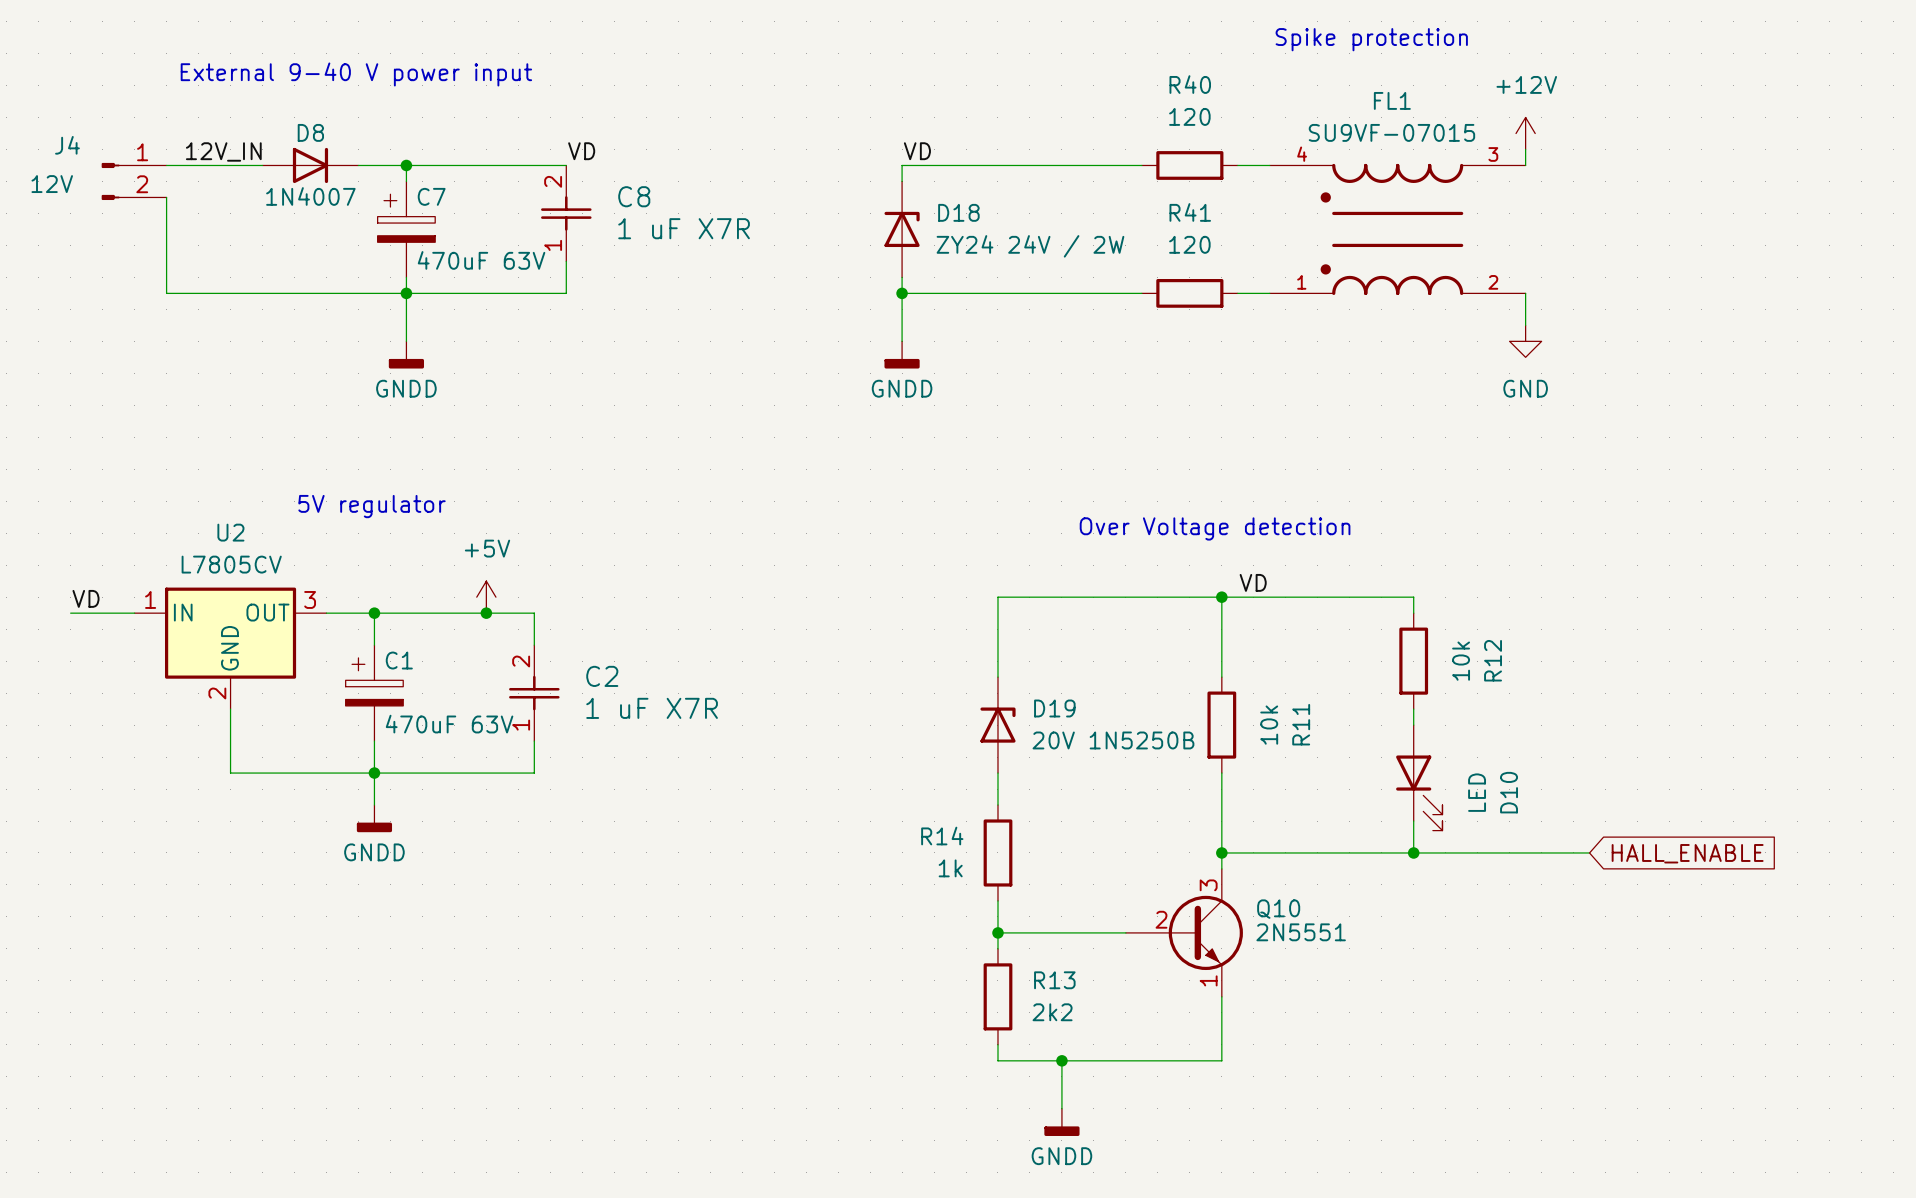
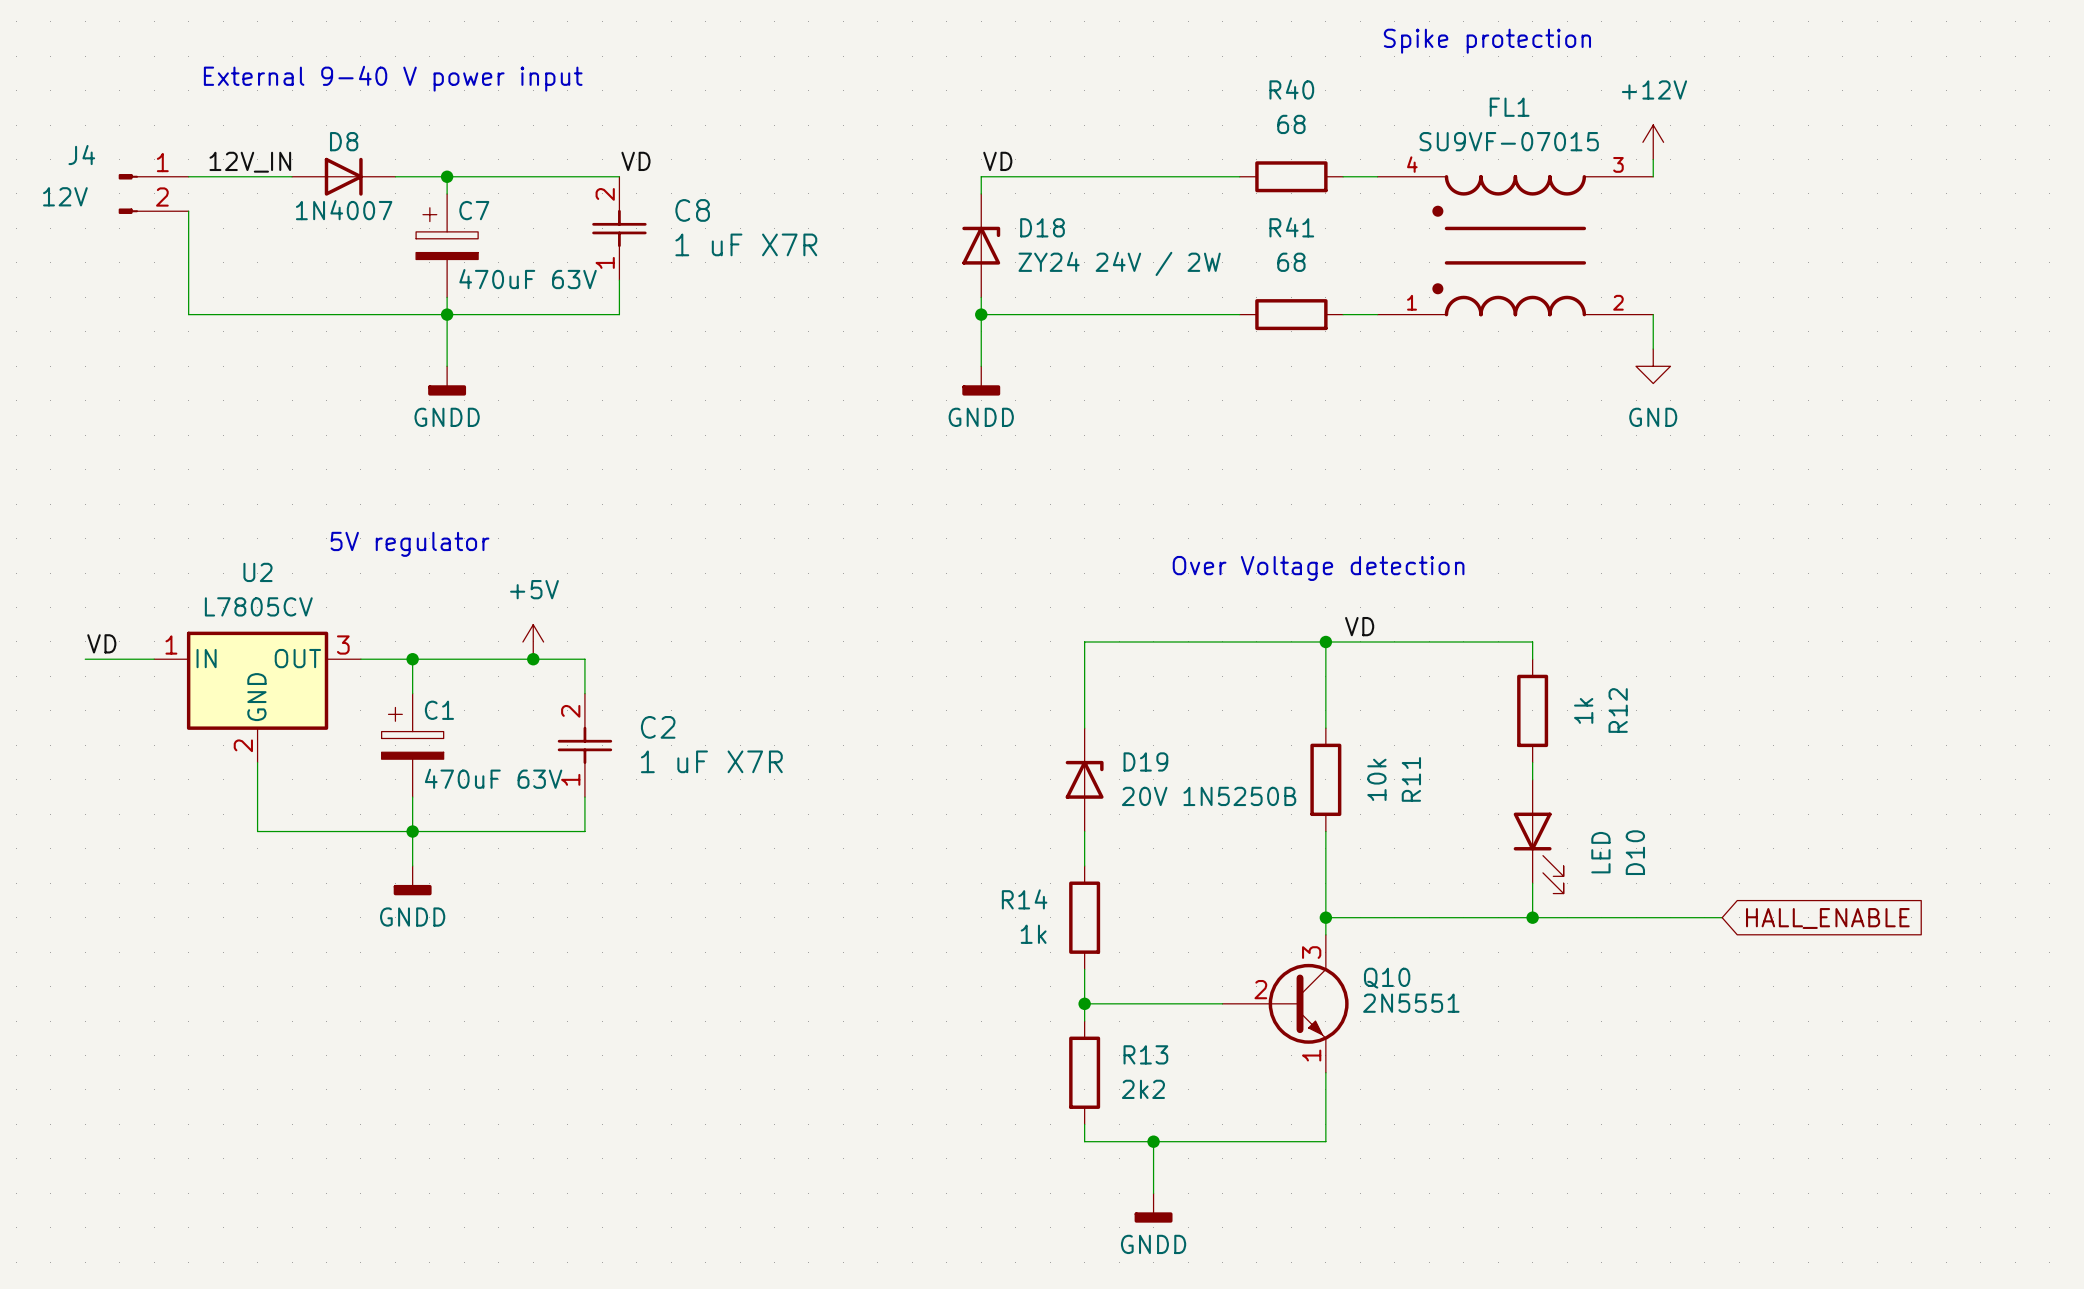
R40 value: 120 (1189, 116) -> 68 (1291, 124)
R41 value: 120 (1189, 244) -> 68 (1291, 262)
R12 value: 10k (1461, 661) -> 1k (1583, 710)

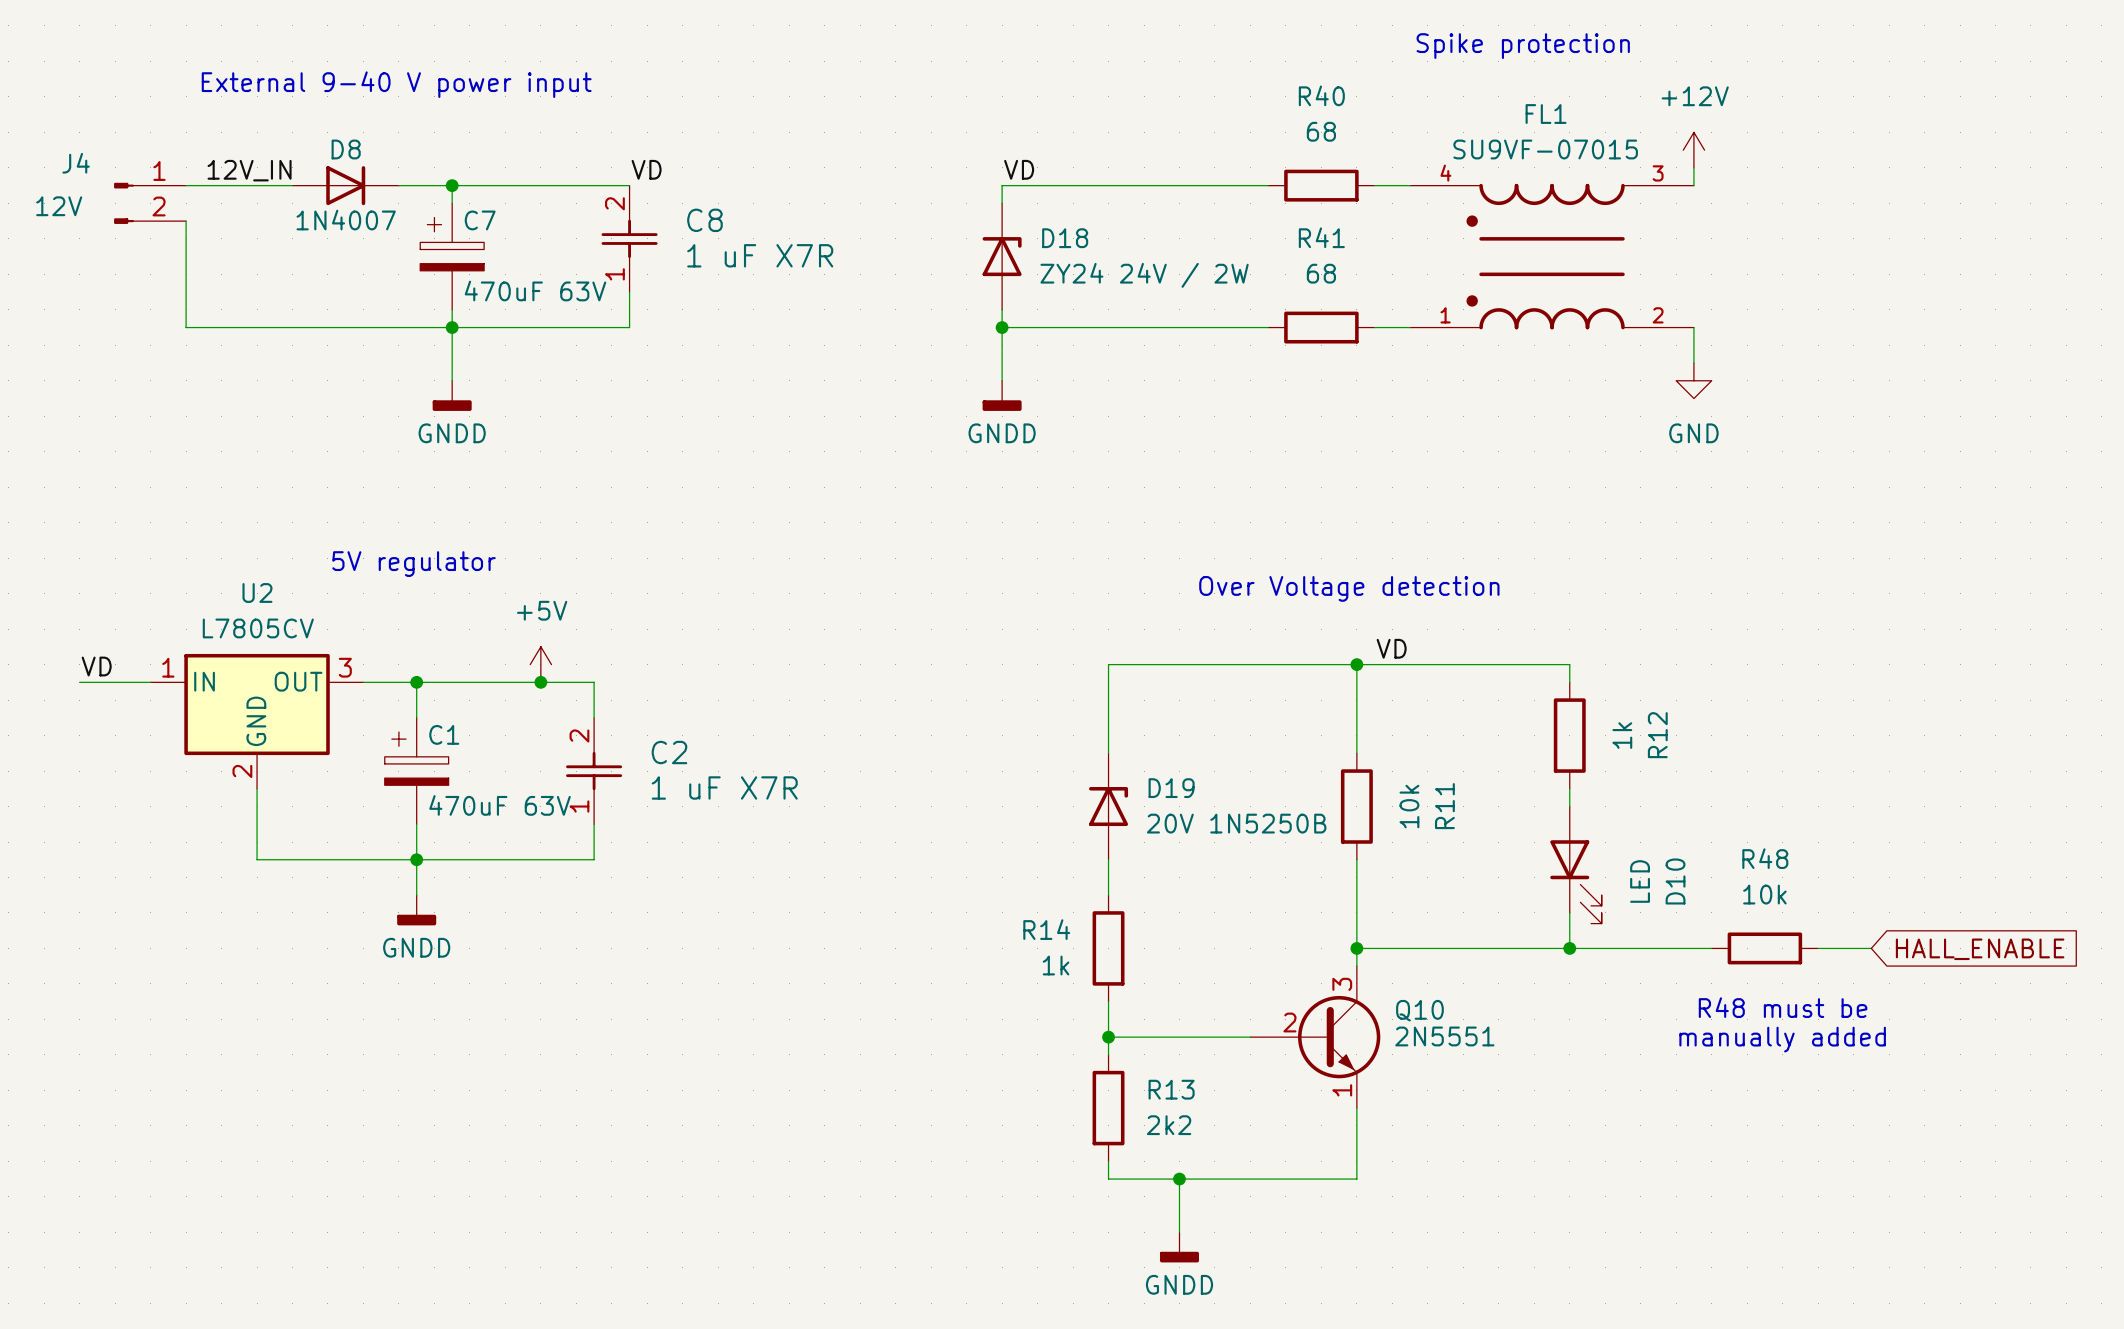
wire: (1670, 917) (1722, 917) -> (1818, 948) (1871, 948)
R48: none -> 10k (1764, 948)
global label position: HALL_ENABLE (1827, 918) -> HALL_ENABLE (1980, 949)
text: none -> R48 must be (1783, 1007)
text: none -> manually added (1782, 1039)

